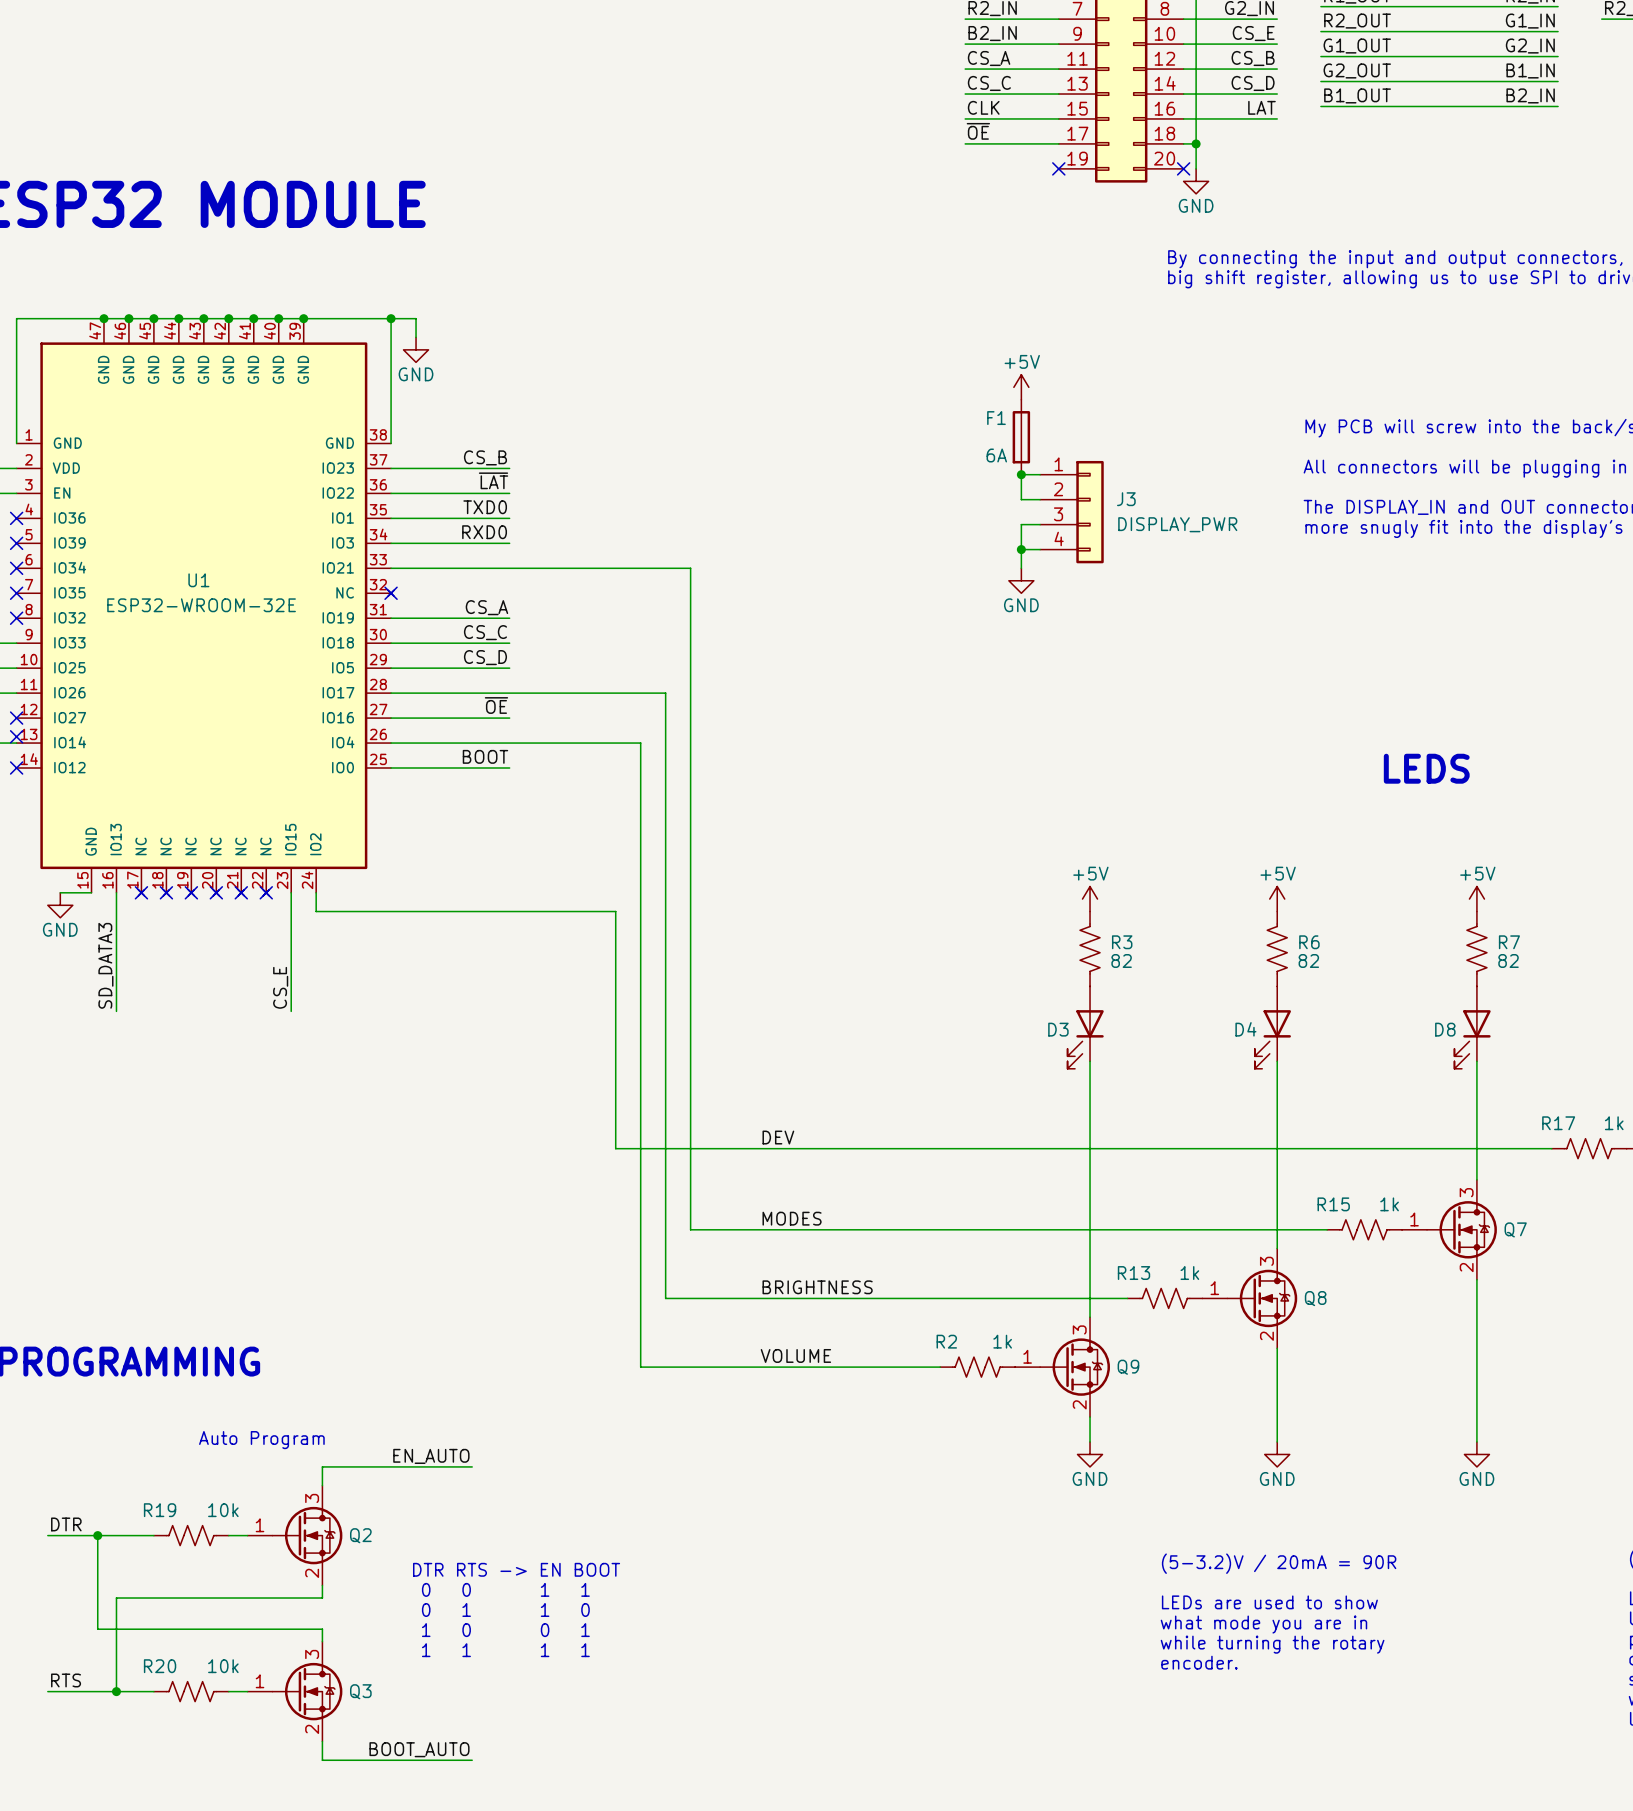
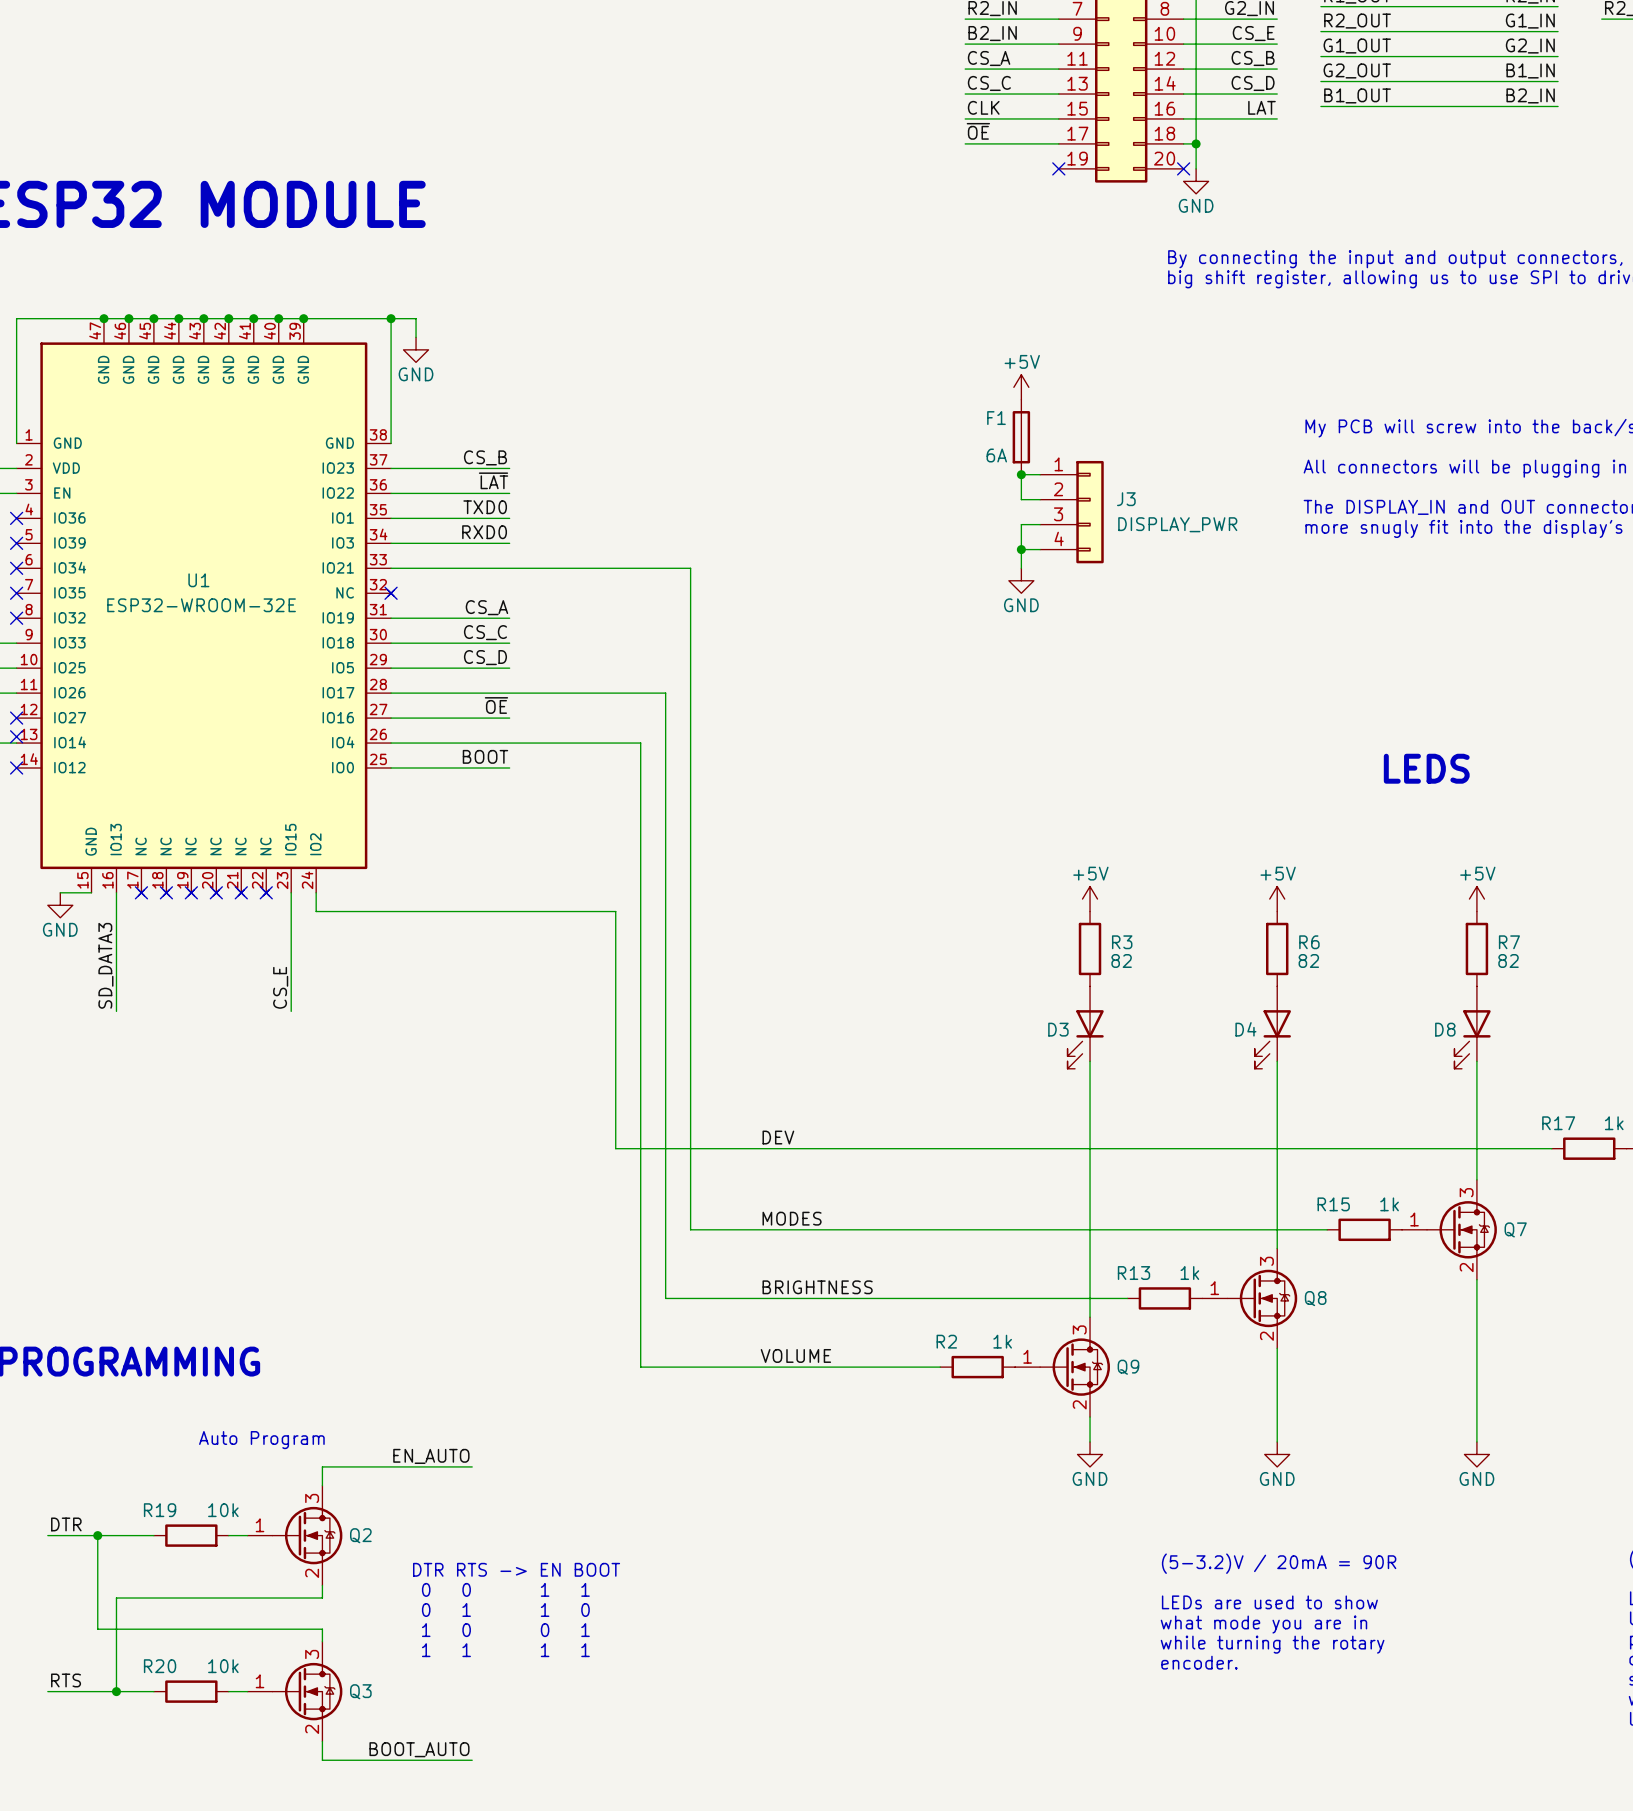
R3 symbol: [1080, 911, 1101, 987] -> [1078, 911, 1102, 987]
R6 symbol: [1267, 911, 1288, 987] -> [1266, 911, 1289, 987]
R7 symbol: [1466, 911, 1487, 987] -> [1465, 911, 1489, 987]
R17 symbol: [1551, 1138, 1627, 1159] -> [1551, 1137, 1627, 1160]
R15 symbol: [1327, 1219, 1403, 1240] -> [1327, 1218, 1403, 1242]
R13 symbol: [1127, 1288, 1203, 1309] -> [1127, 1287, 1203, 1310]
R2 symbol: [940, 1357, 1016, 1378] -> [940, 1355, 1016, 1379]
R19 symbol: [153, 1525, 229, 1546] -> [153, 1524, 229, 1547]
R20 symbol: [153, 1681, 229, 1702] -> [153, 1680, 229, 1703]

